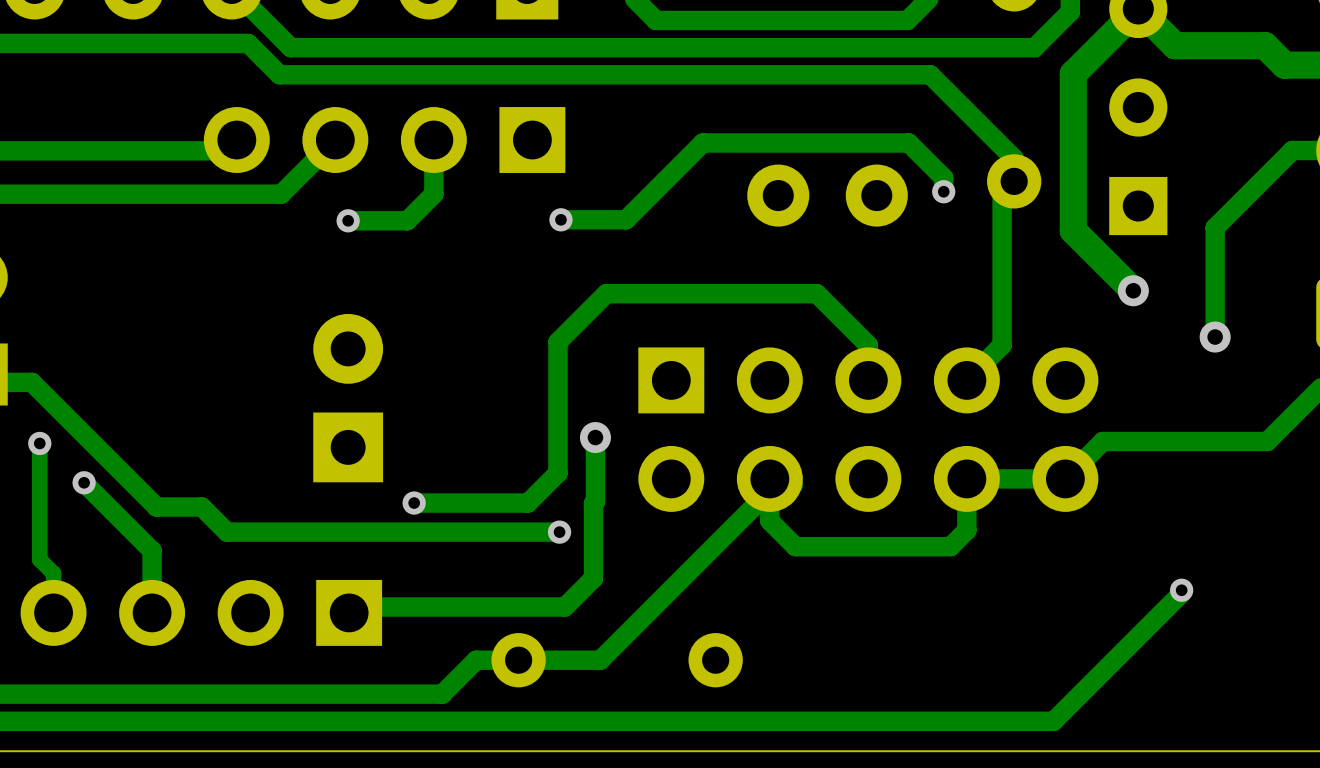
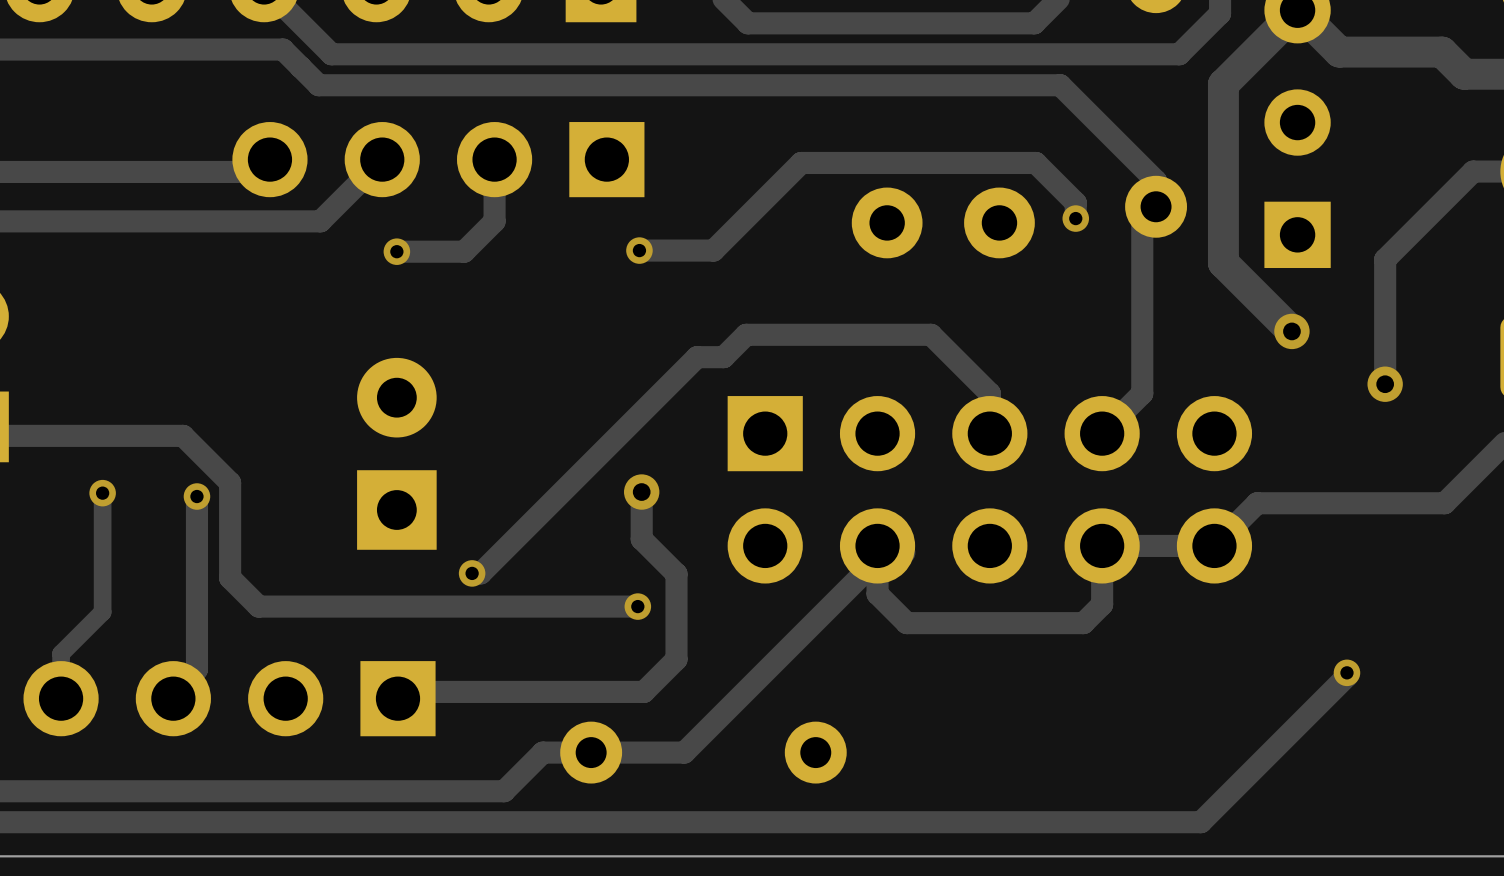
track: (654, 293) (606, 293) (558, 341) (558, 473) (527, 503) (421, 503) -> (746, 334) (723, 357) (697, 357) (480, 573)
track: (31, 382) (156, 507) (201, 507) -> (36, 435) (183, 435) (230, 482) (230, 577)
via: none -> (102, 493)
via: none -> (196, 496)
track: (595, 437) (595, 501) (593, 503) -> (641, 492) (641, 539) (676, 574)
via position: (595, 437) -> (641, 492)
track: (39, 443) (39, 559) (53, 573) -> (102, 493) (102, 612) (61, 653)
via: (39, 443) -> none
track: (84, 482) (152, 550) (152, 607) -> (196, 496) (196, 669) (173, 693)
via: (84, 482) -> none

